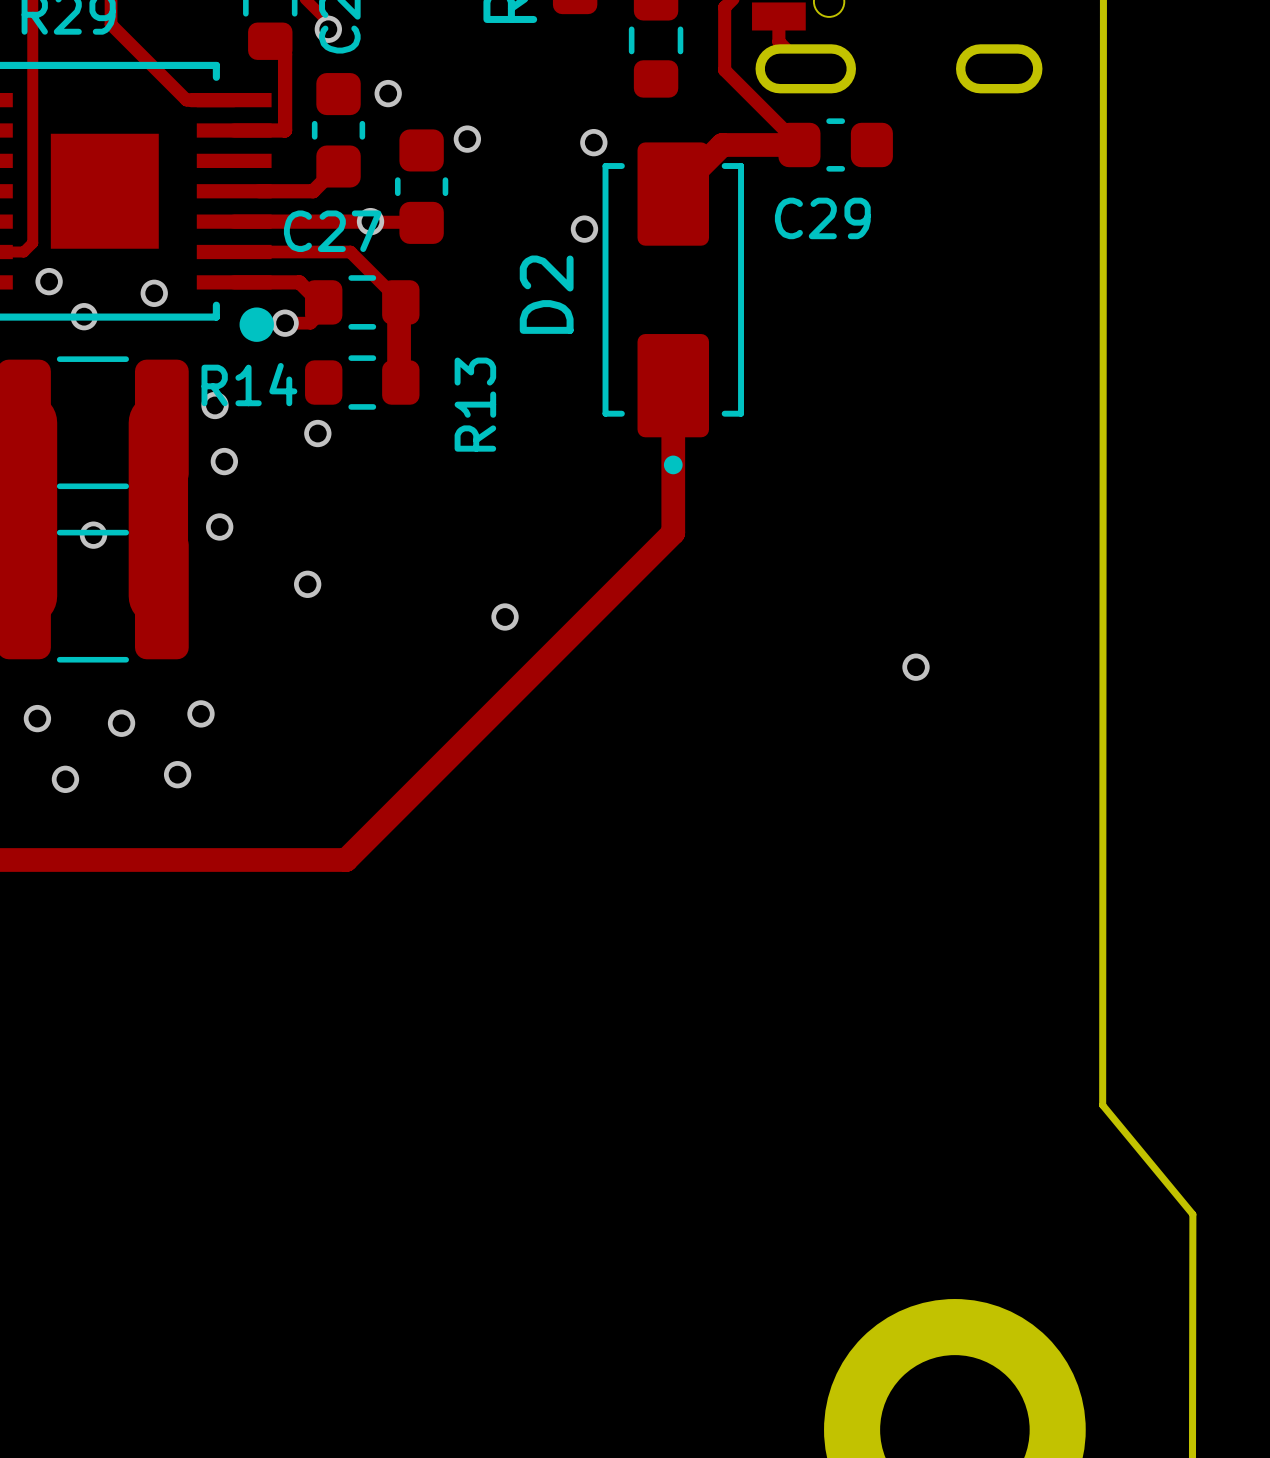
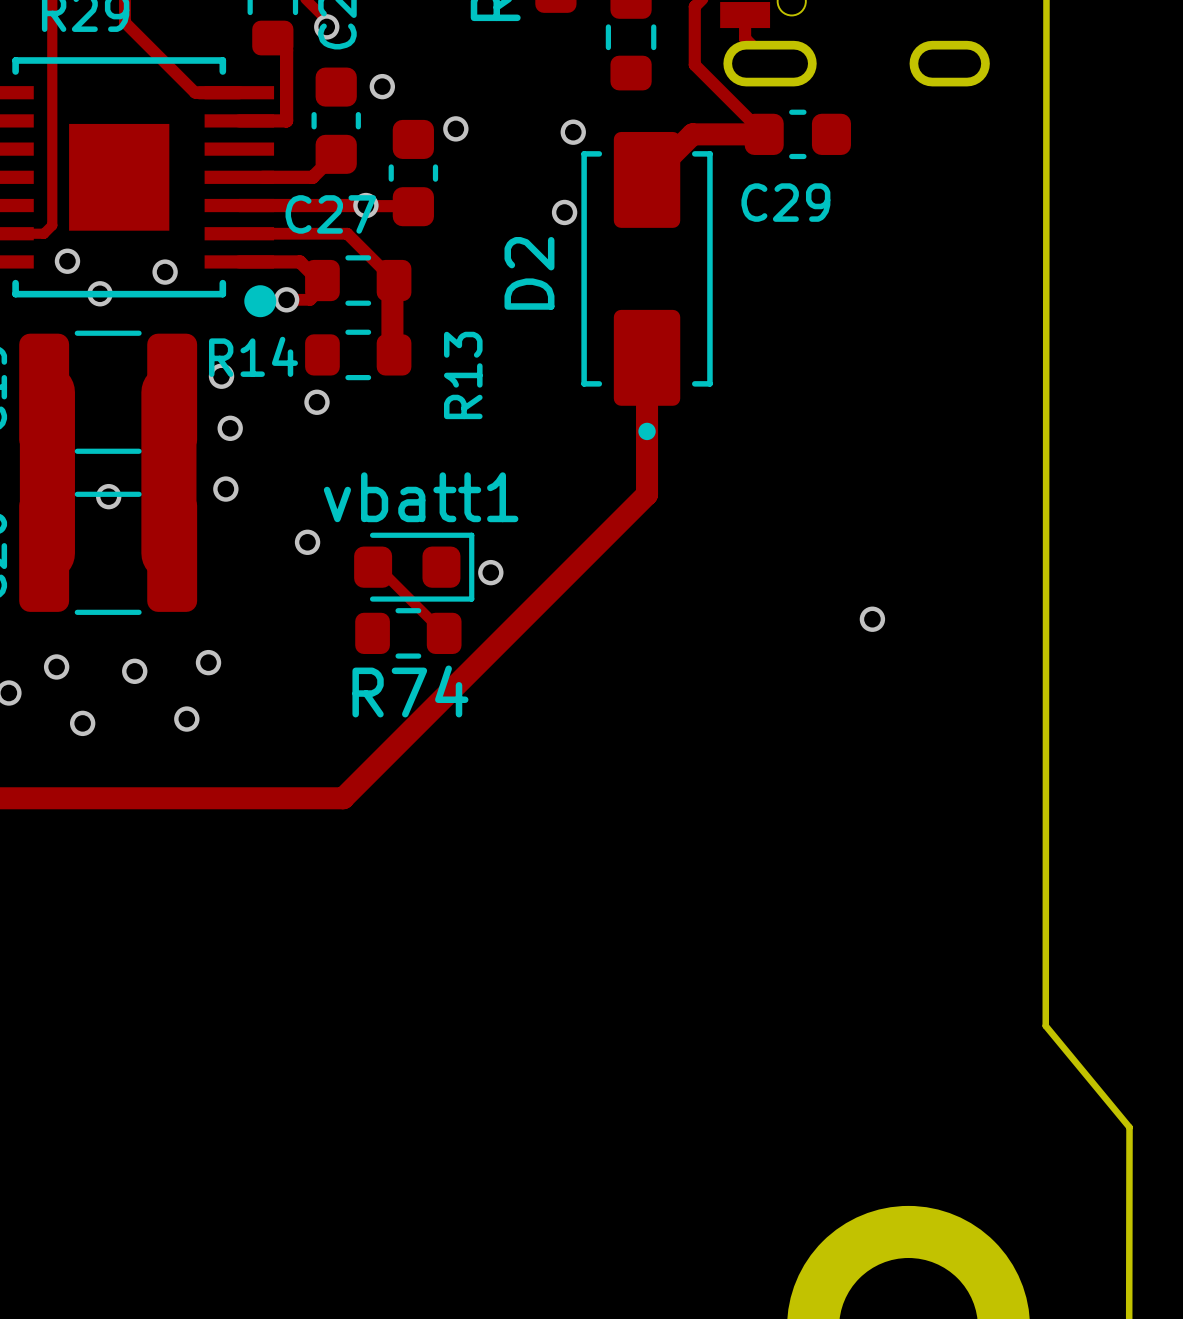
track: none -> (373, 567) (377, 567) (444, 633)
vbatt1: none -> (414, 567)
R74: none -> (408, 633)

